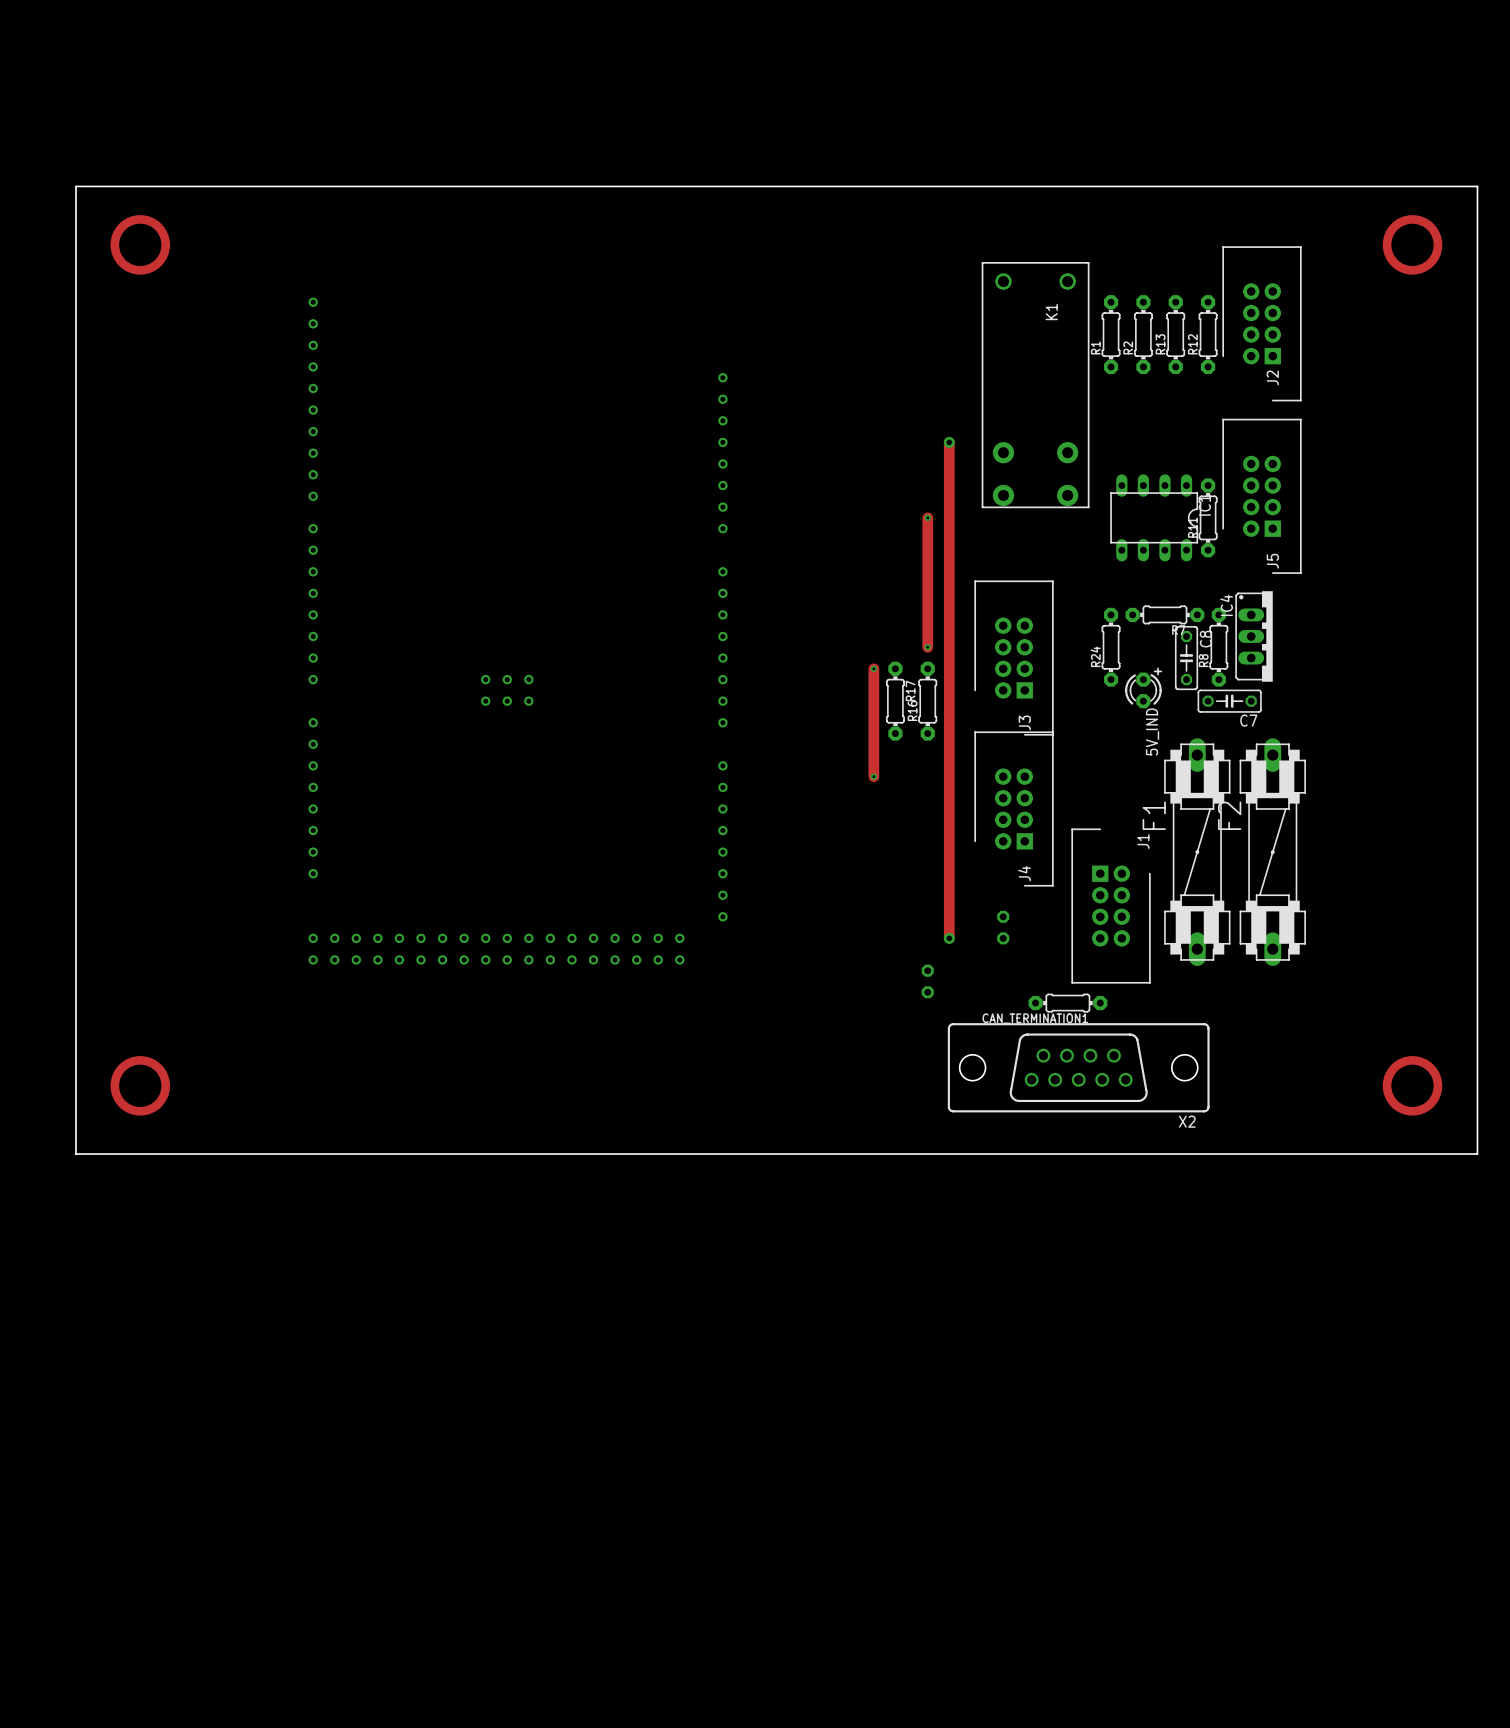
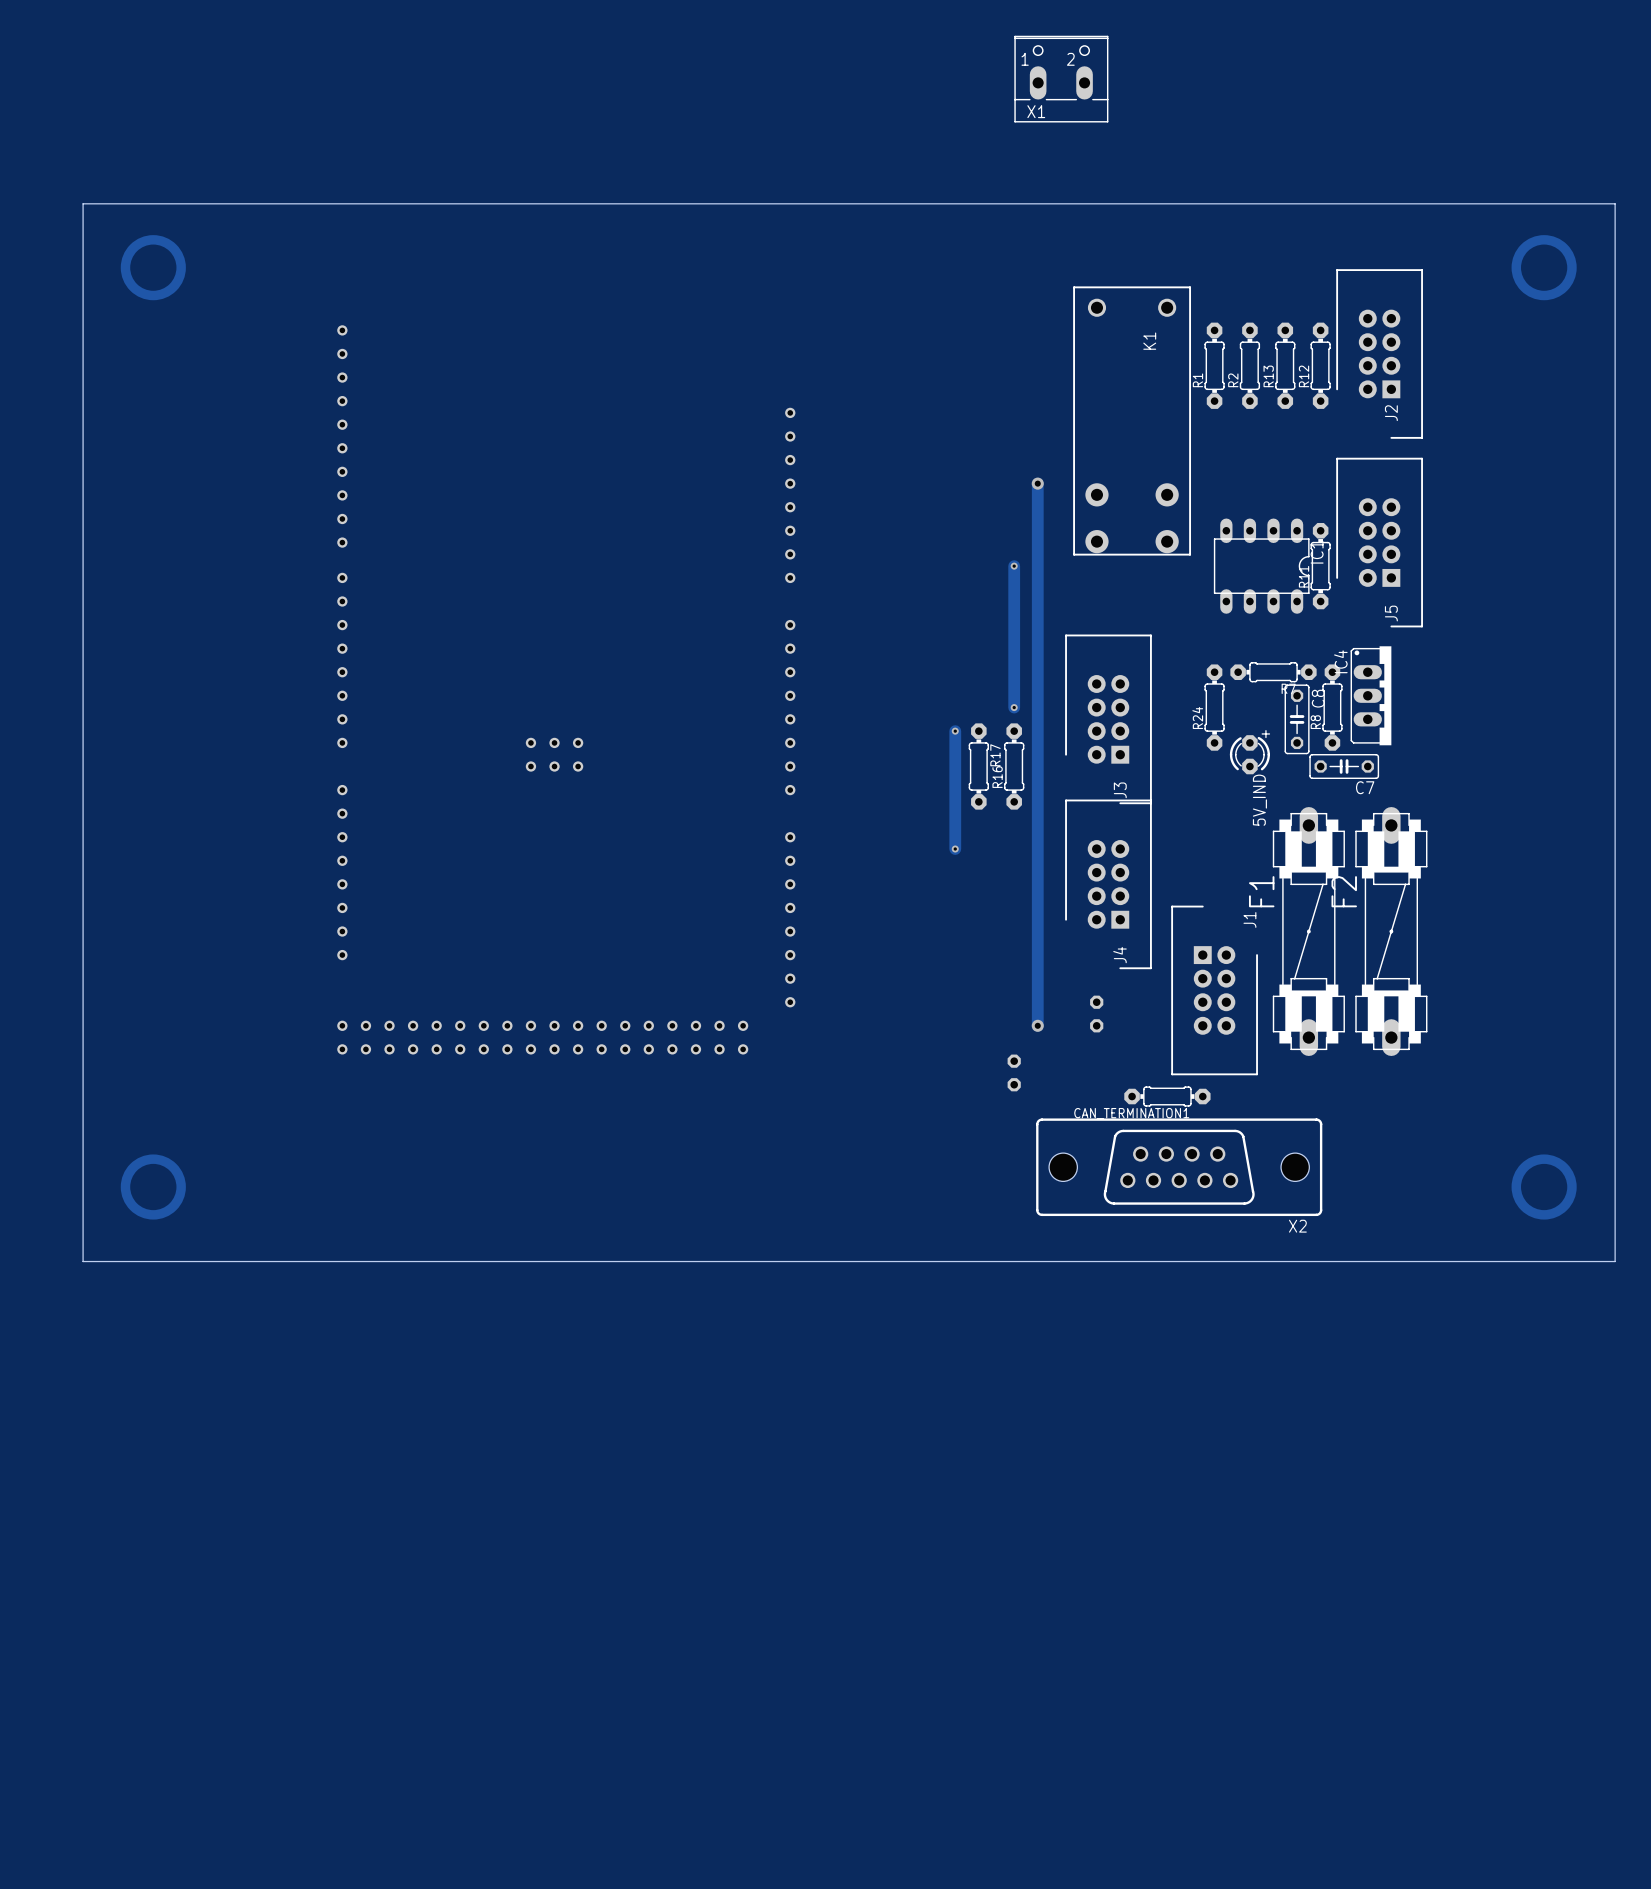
X1: none -> (1061, 79)

